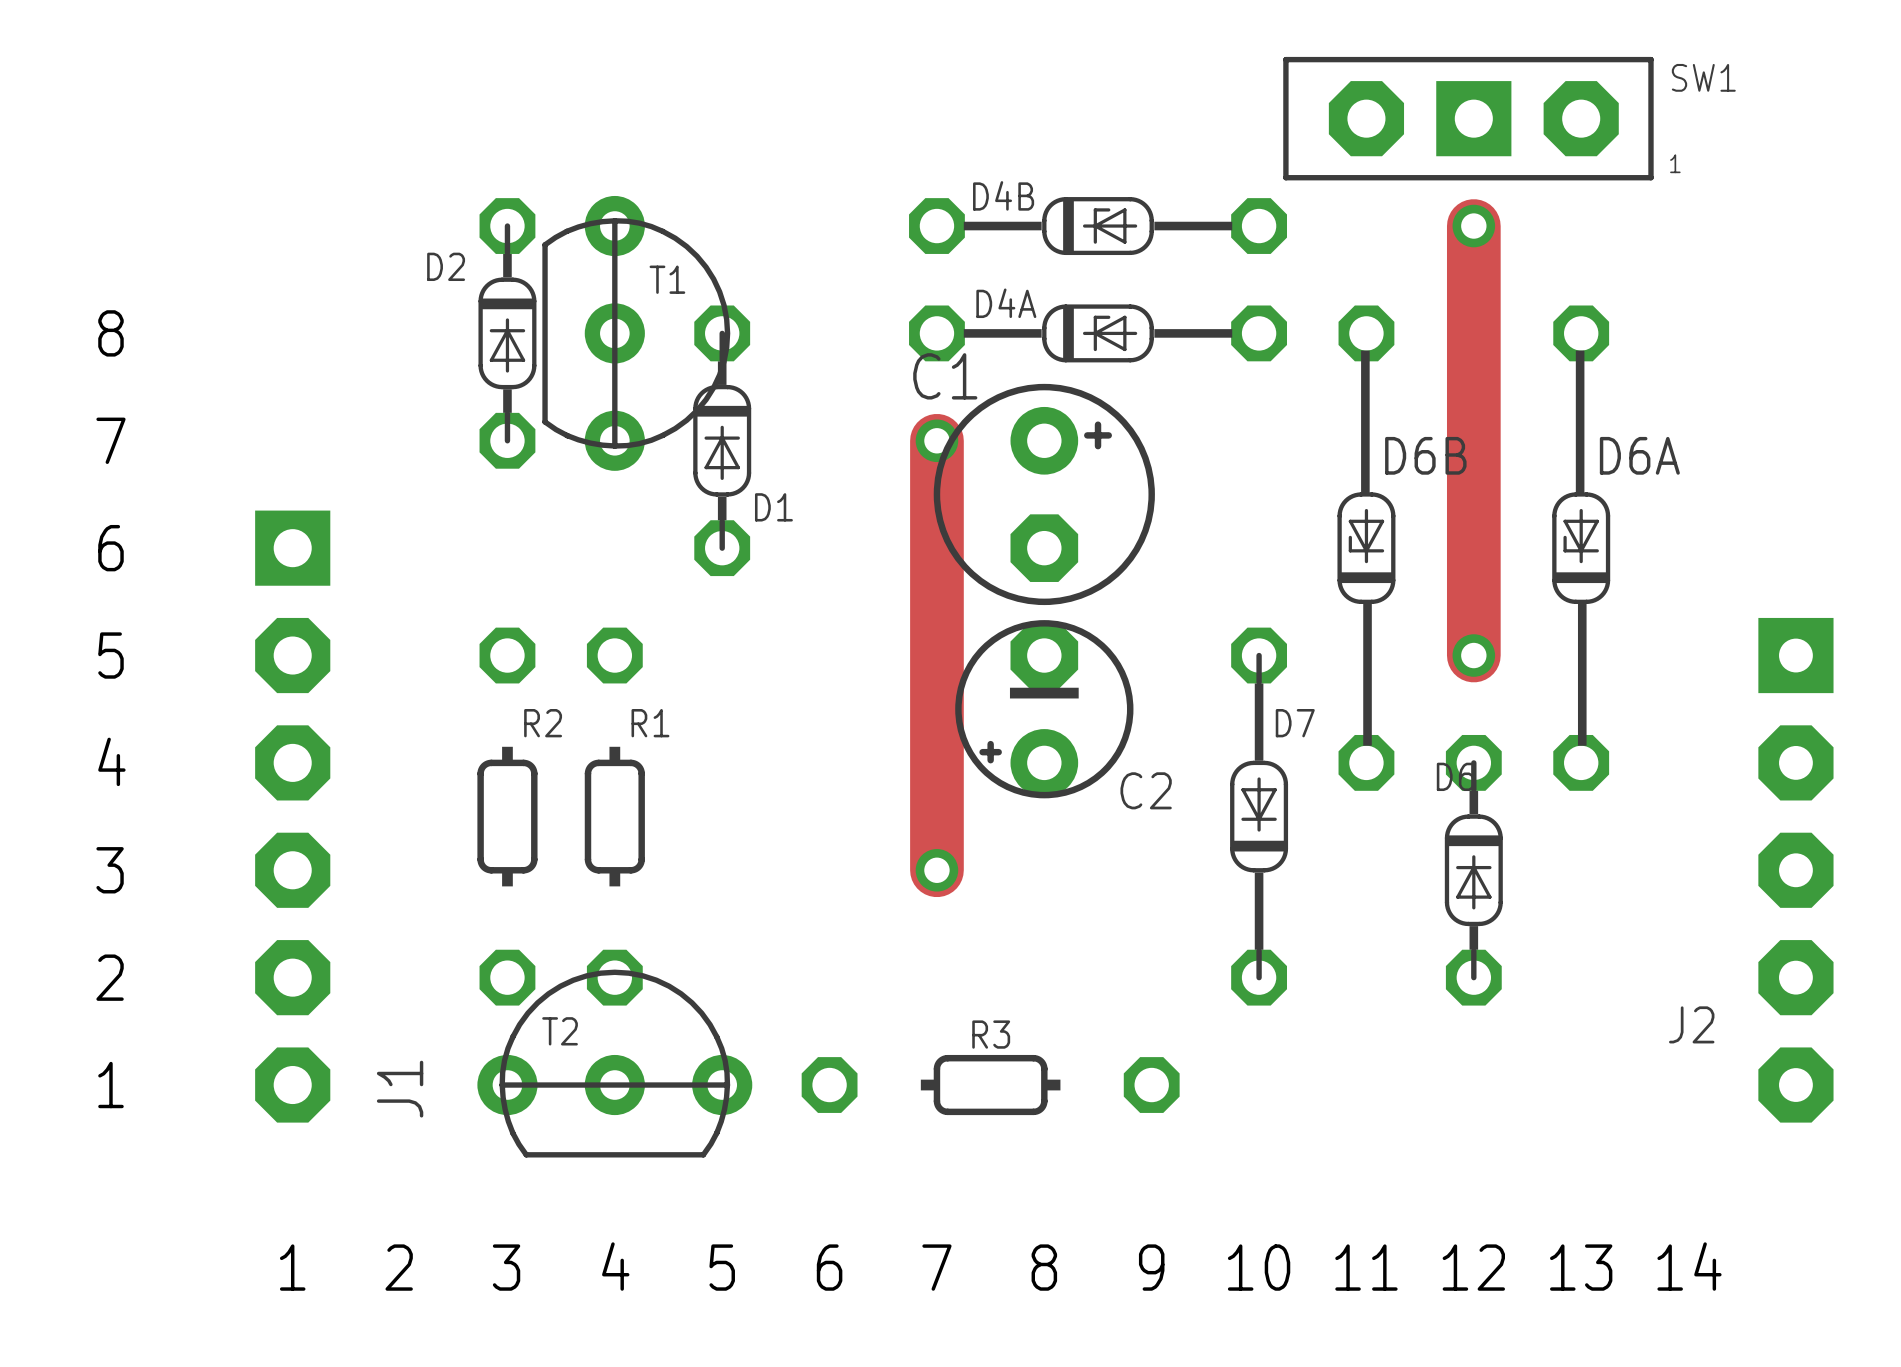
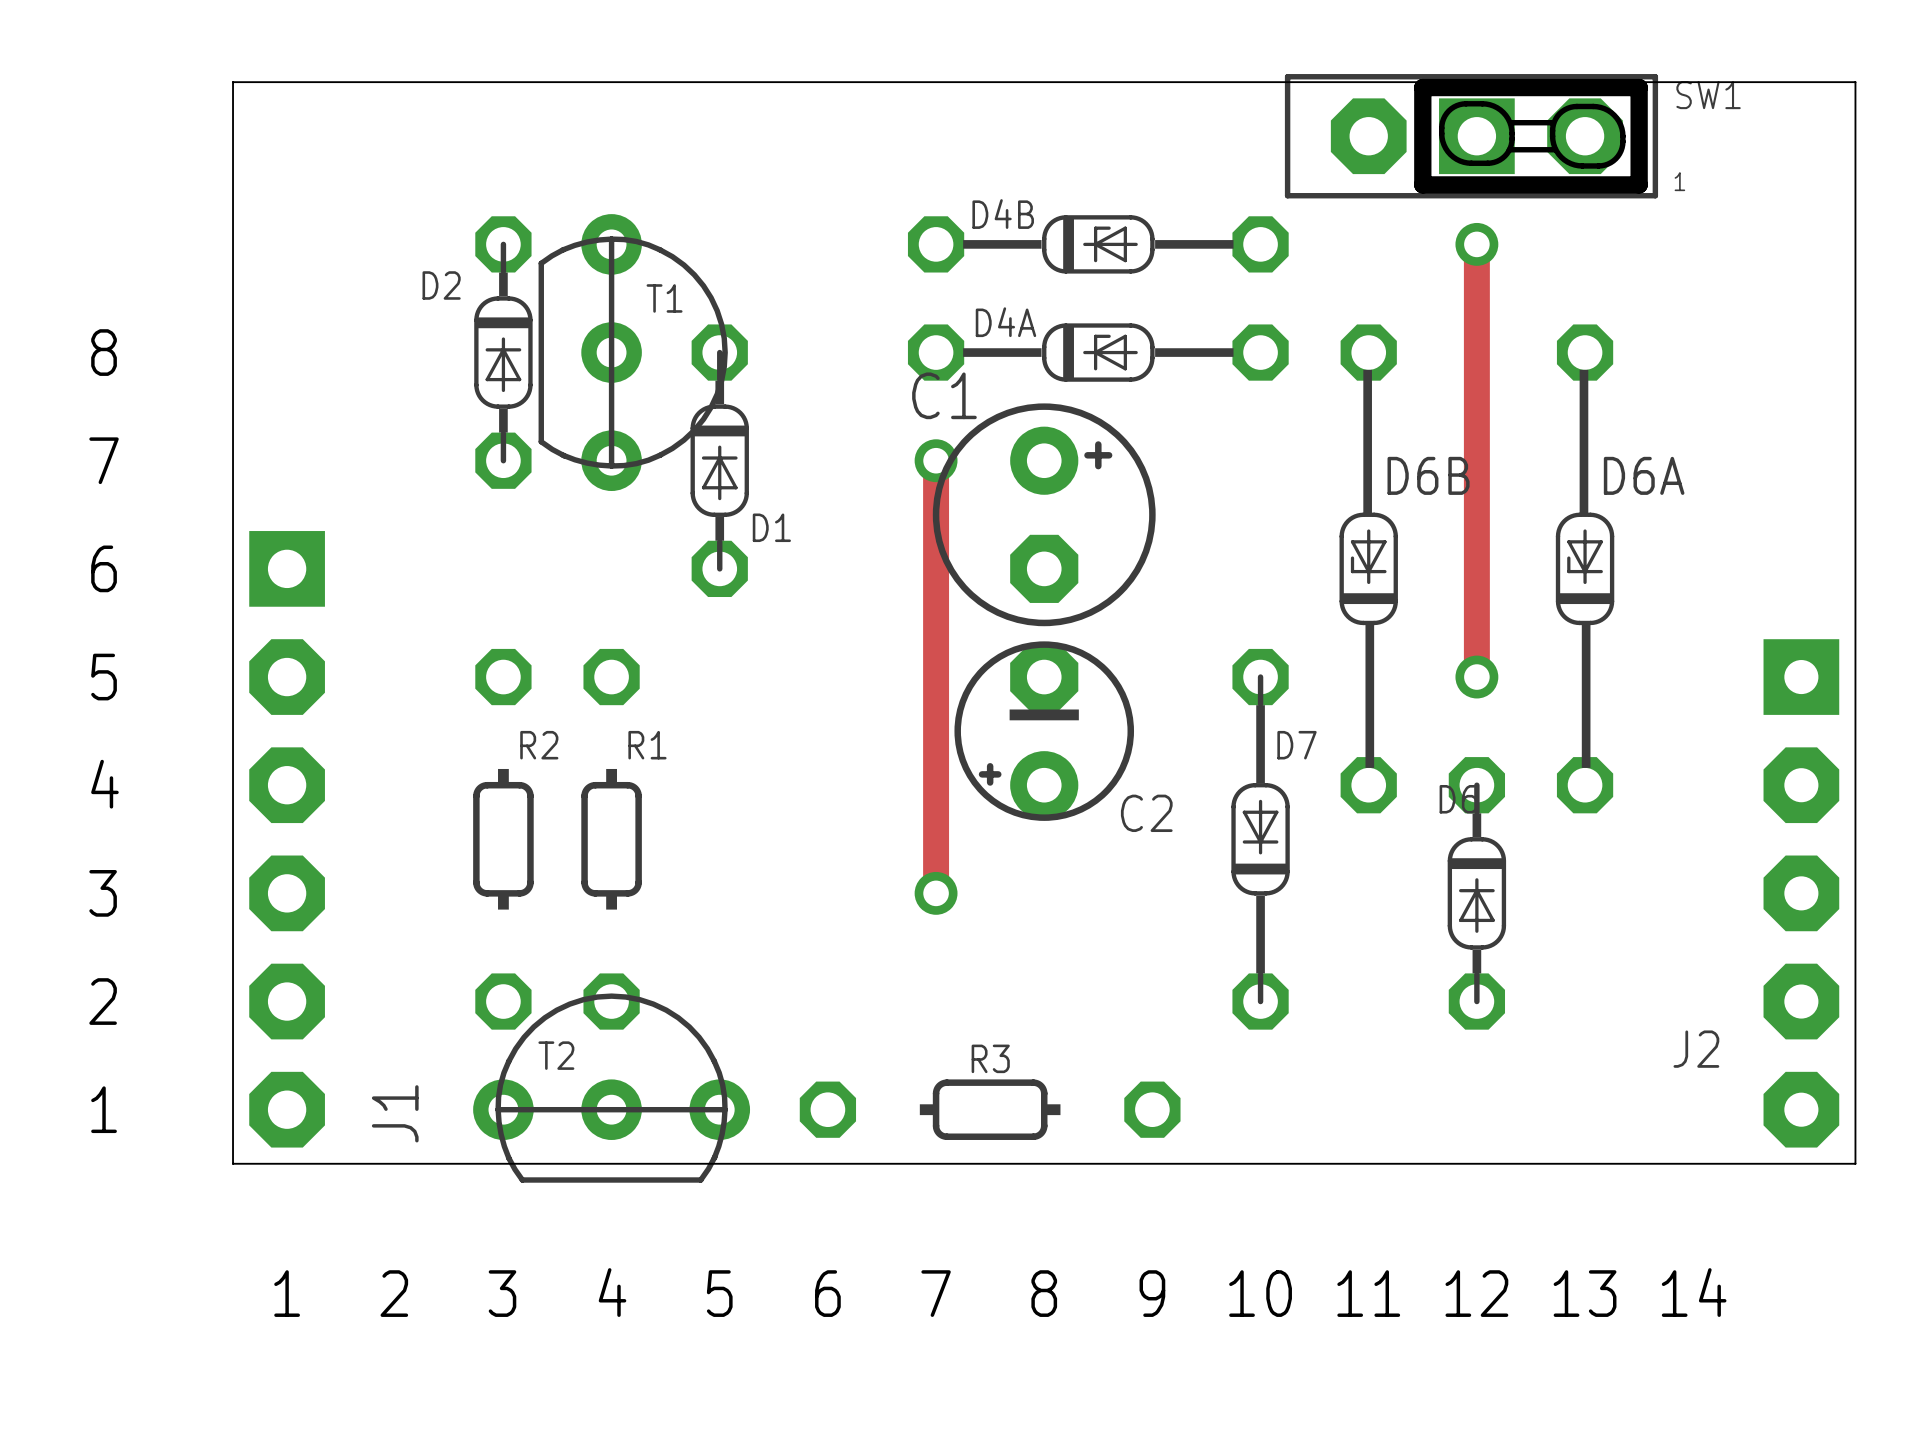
SW1 footprint: [1283, 56, 1654, 181] -> [1284, 74, 1659, 199]
board edge: none -> (233, 82) (1855, 82) (1855, 1163) (233, 1163) (233, 82)
track width: thick (1473, 226) (1473, 655) -> thin (1476, 244) (1476, 677)
track width: thick (936, 440) (936, 870) -> thin (936, 460) (936, 893)

